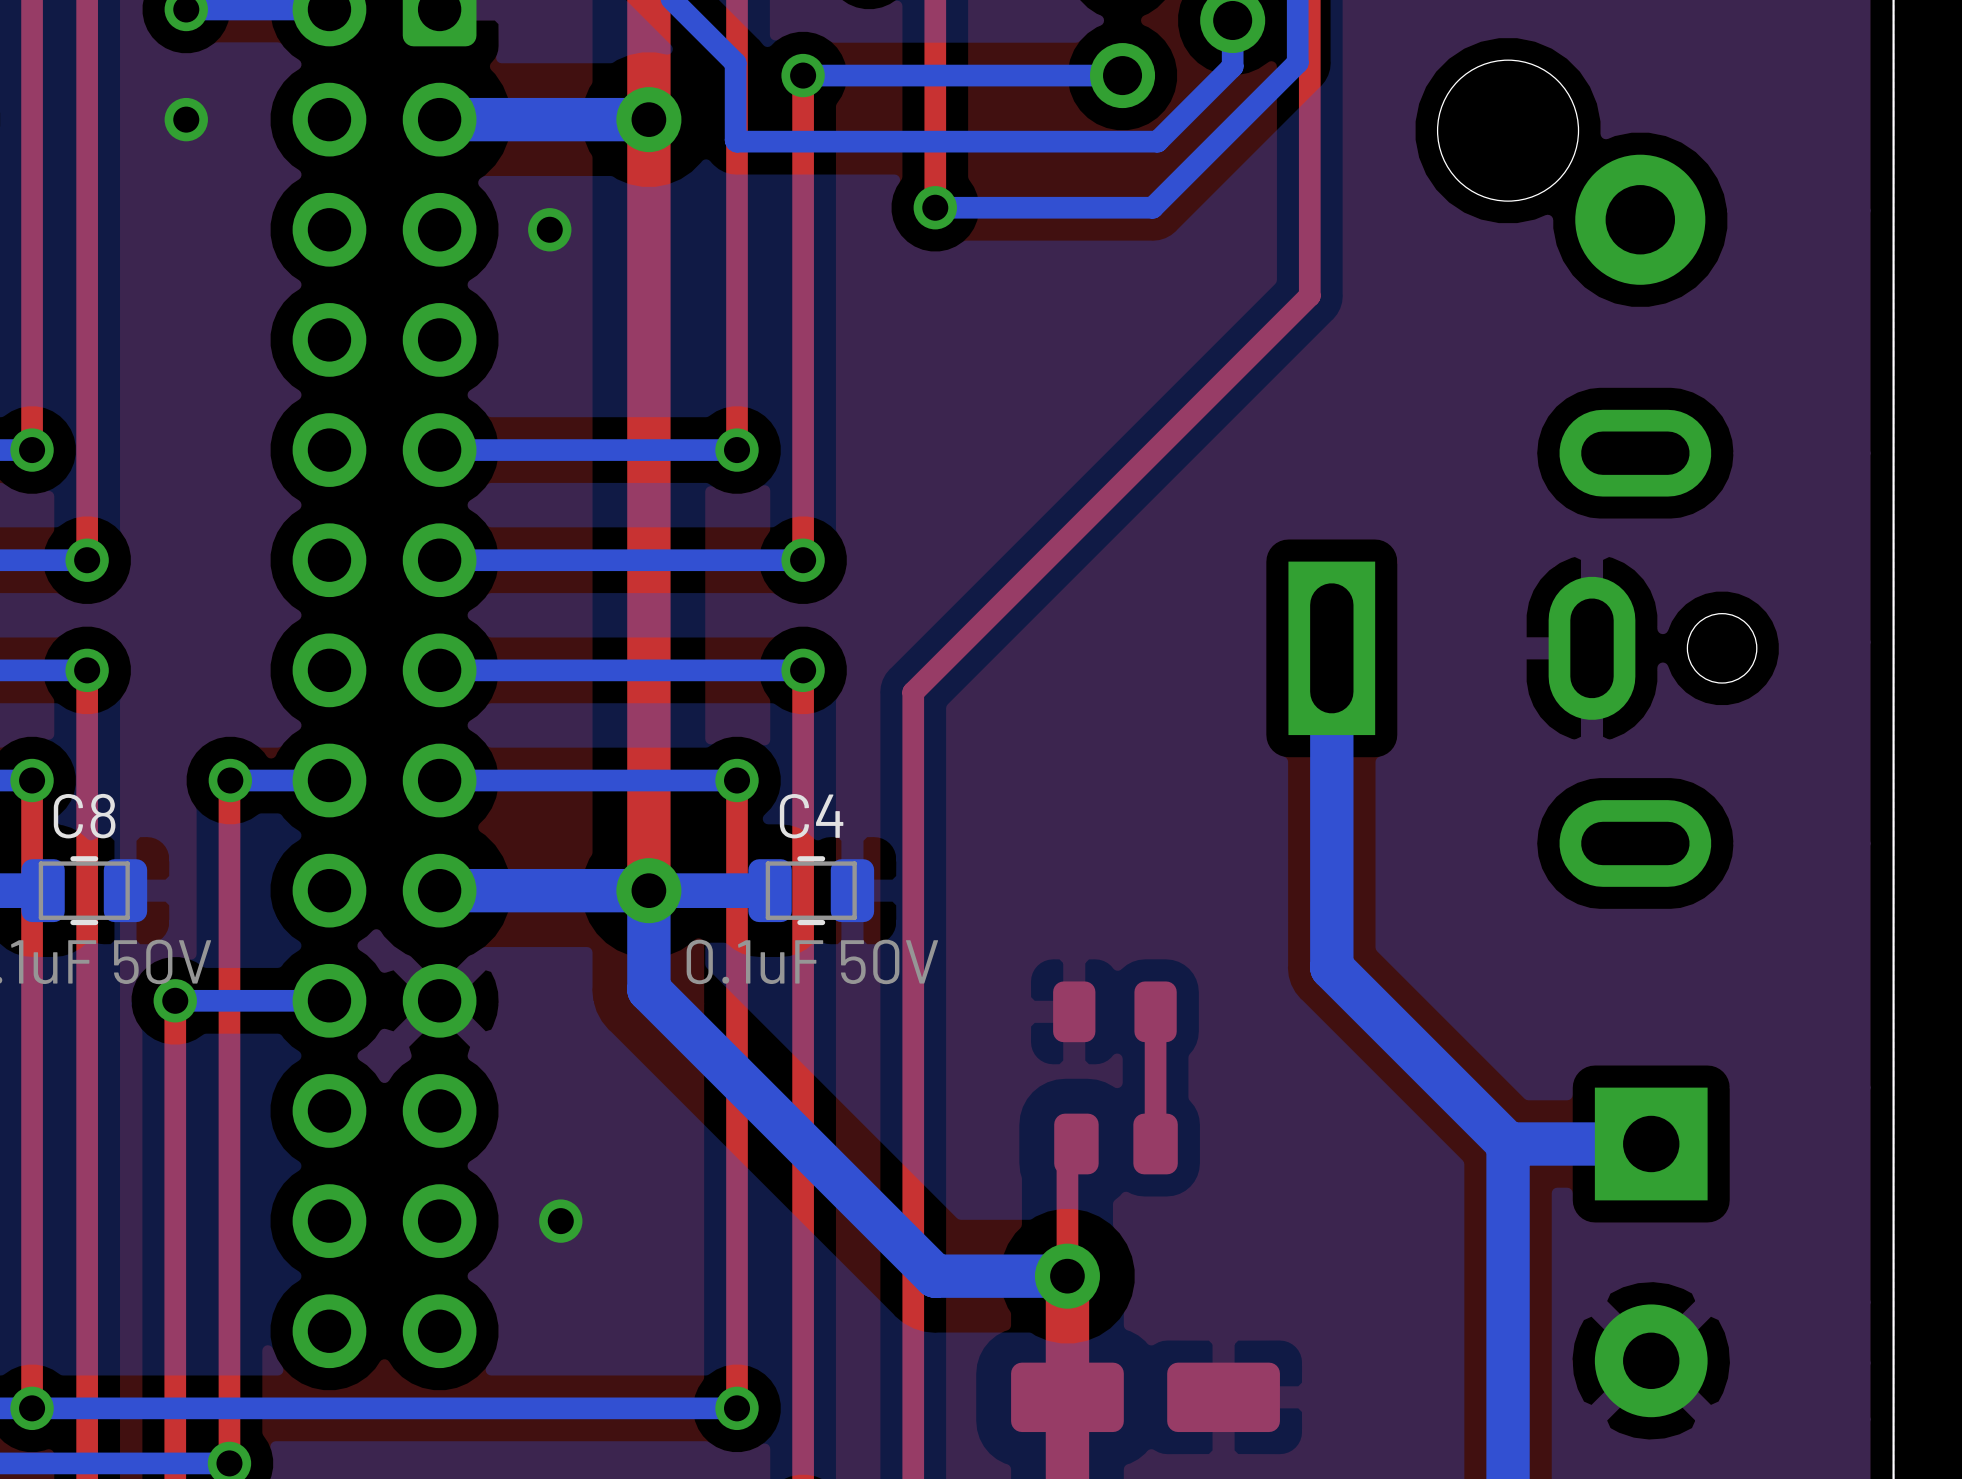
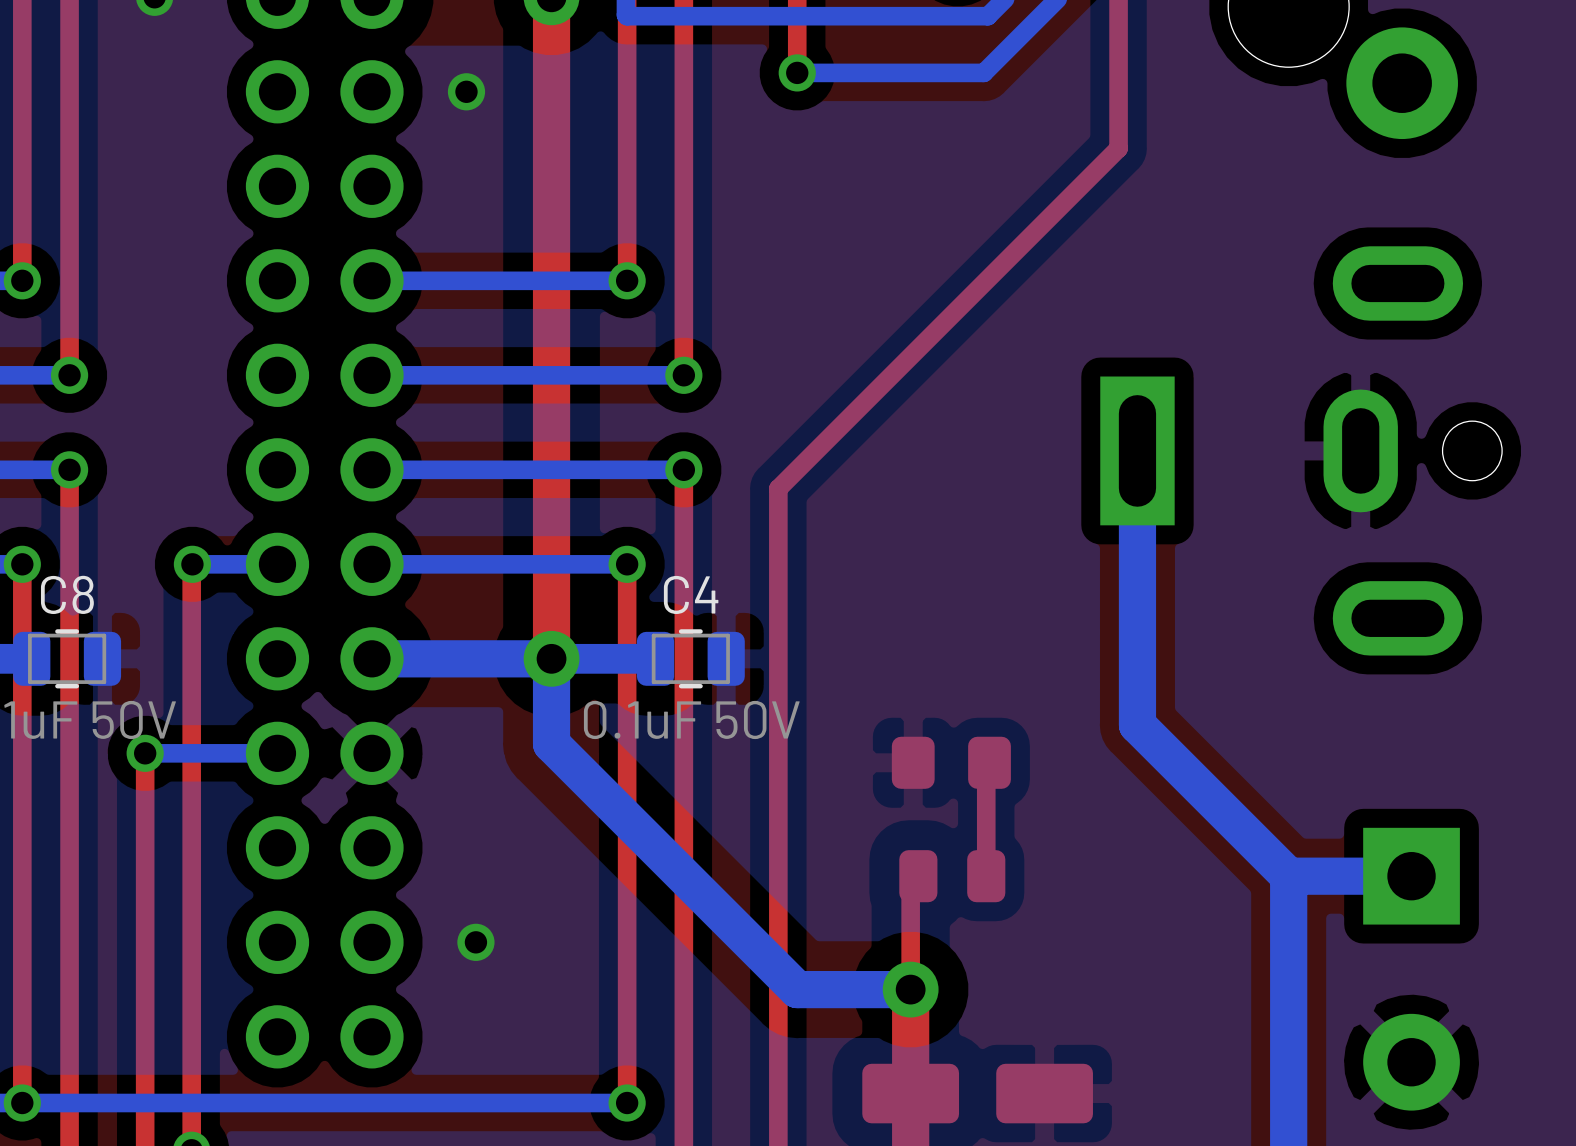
part footprint: [1053, 981, 1177, 1043] -> [891, 736, 1011, 789]

